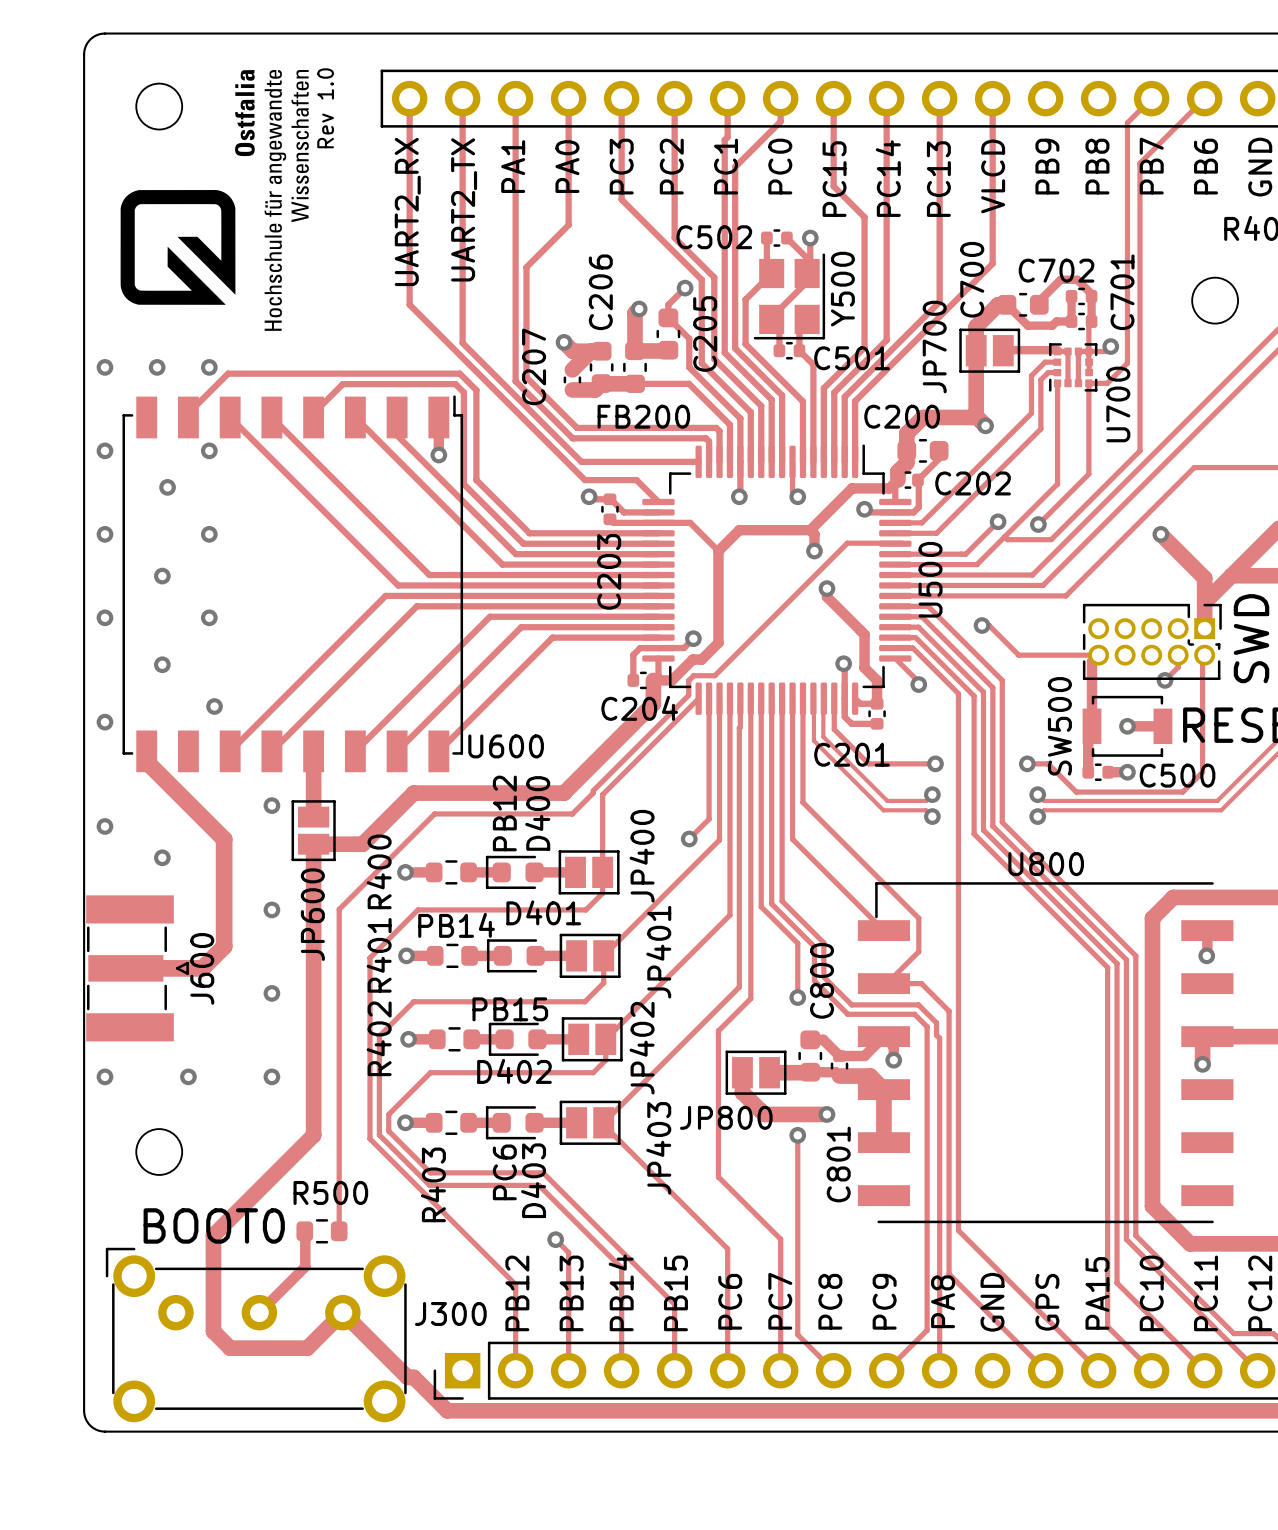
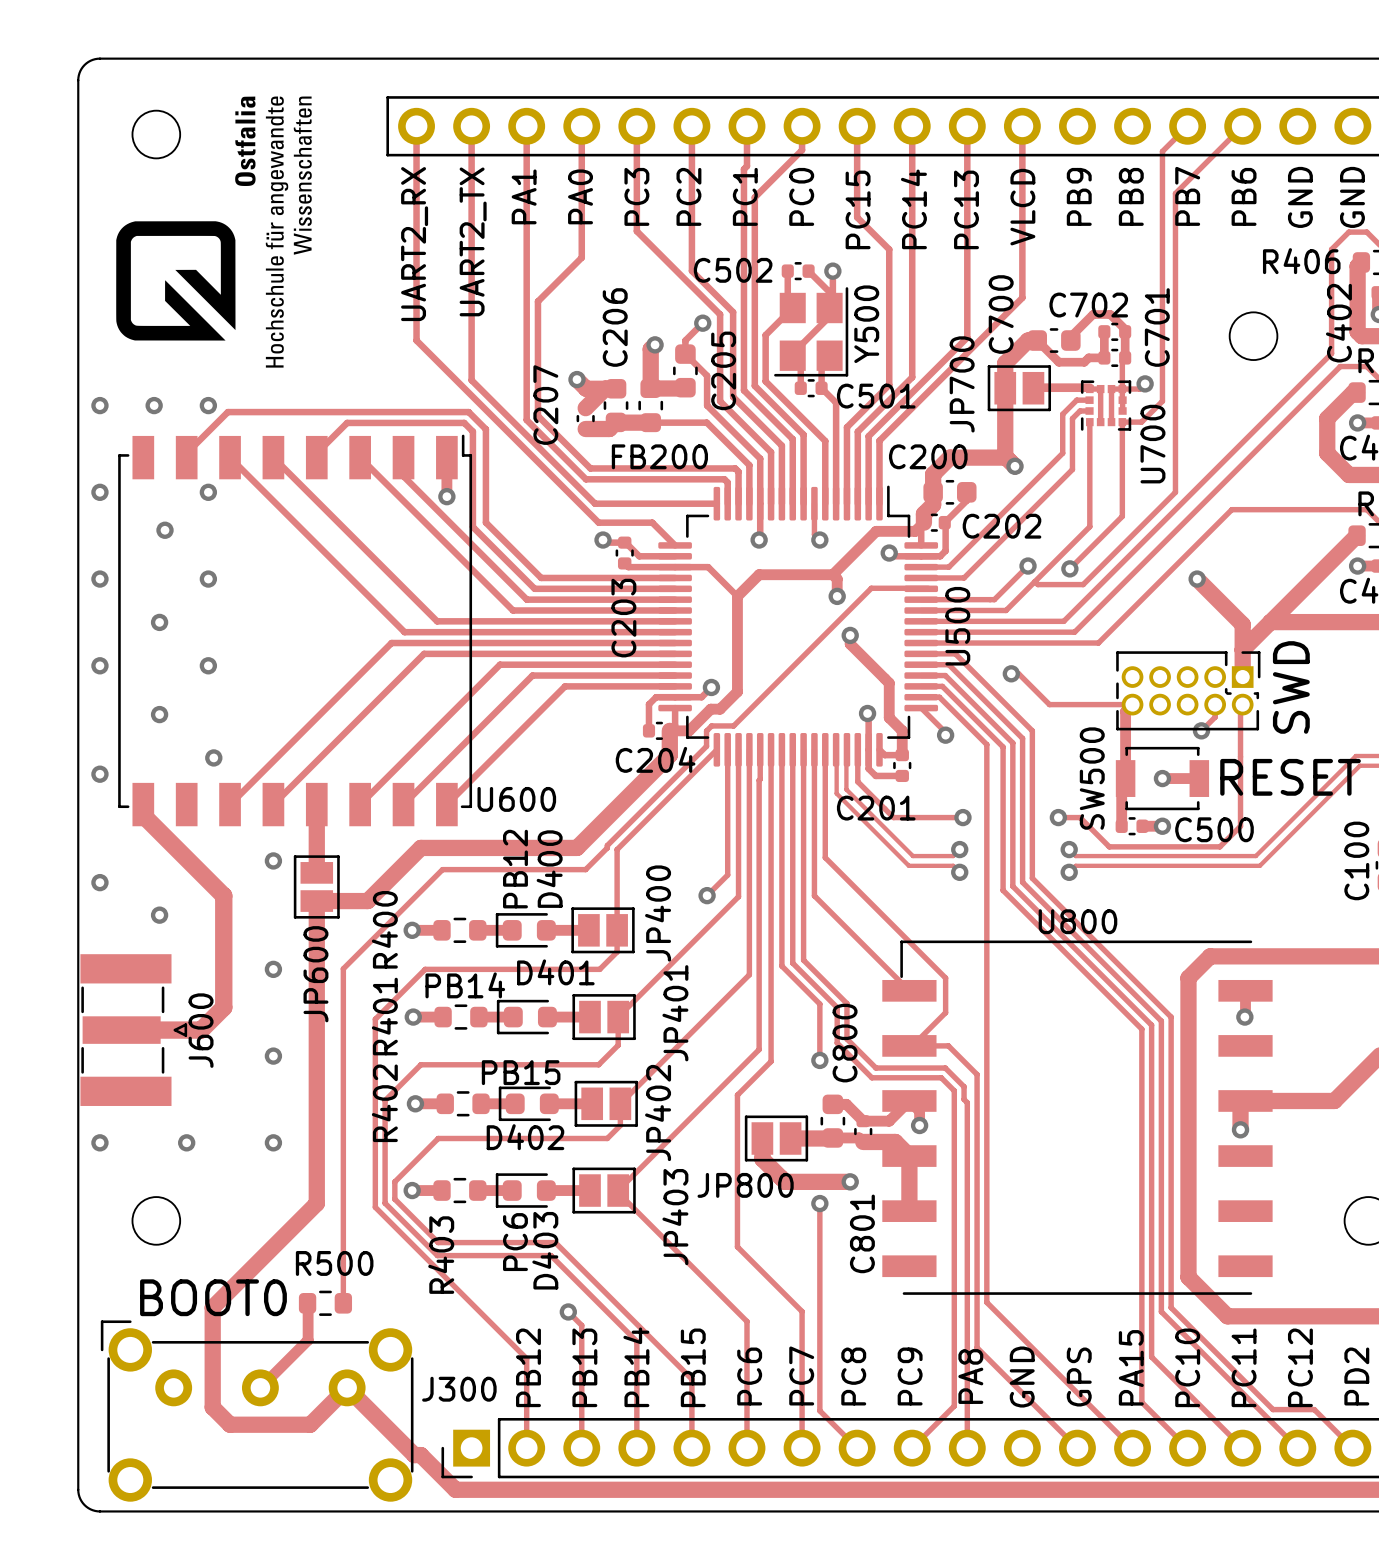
text: Rev 1.0 (325, 108) -> none

